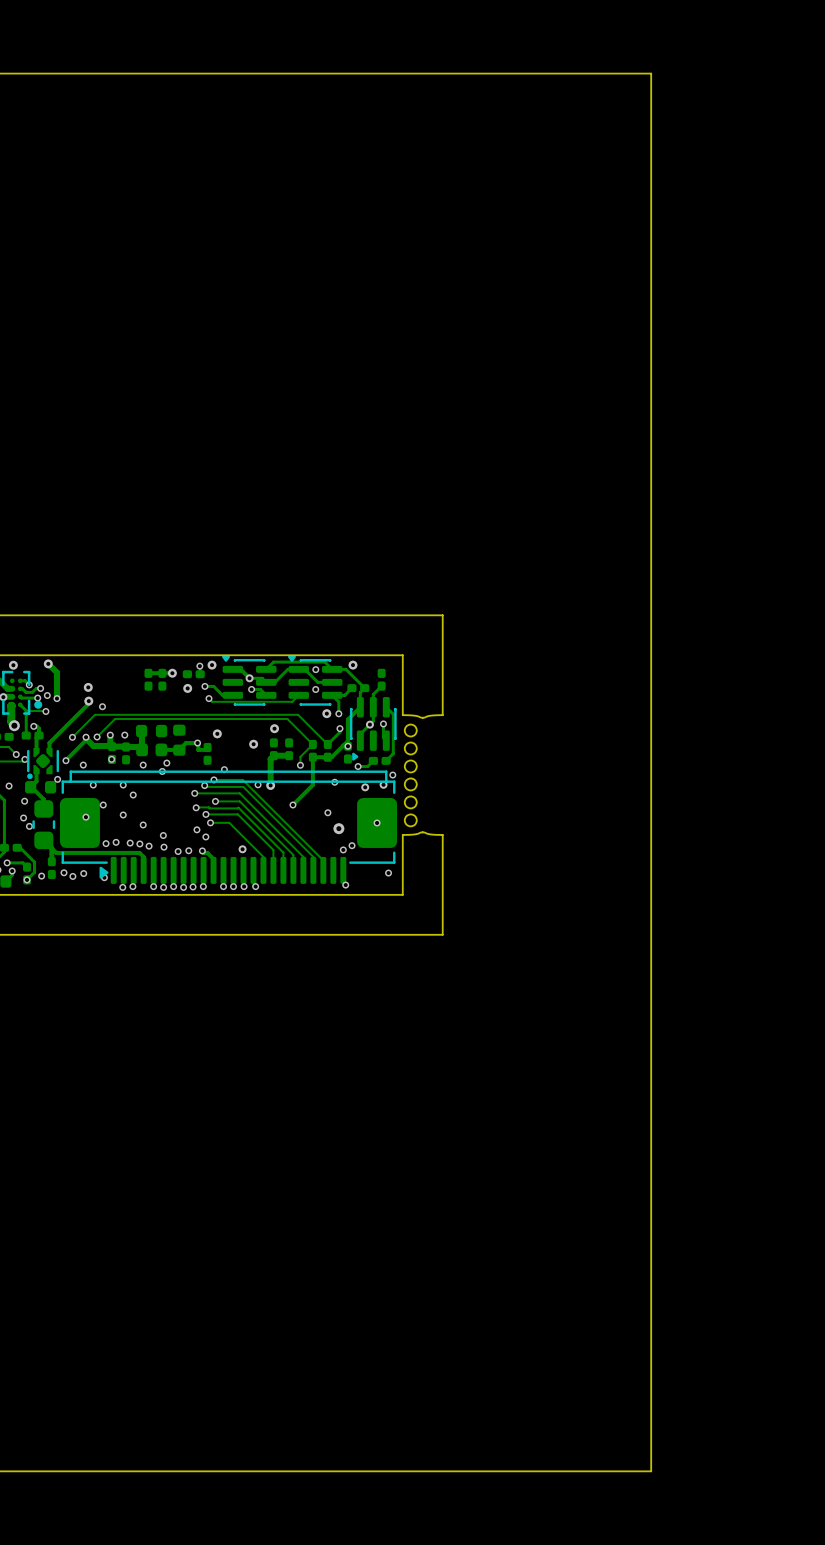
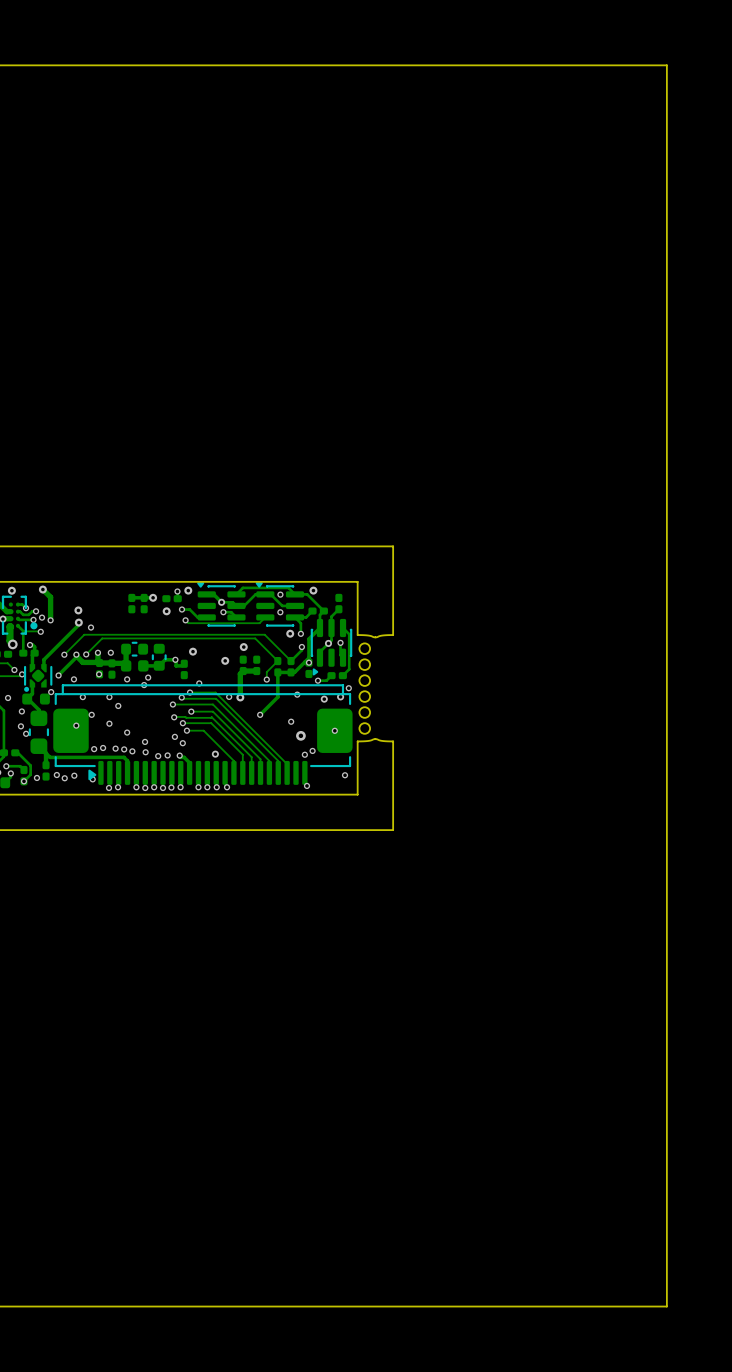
board edge: (651, 73) (651, 1471) -> (578, 65) (666, 65) (666, 1306) (578, 1306)
part footprint: [136, 724, 168, 738] -> [121, 641, 149, 657]
part footprint: [173, 724, 186, 756] -> [151, 643, 167, 671]

